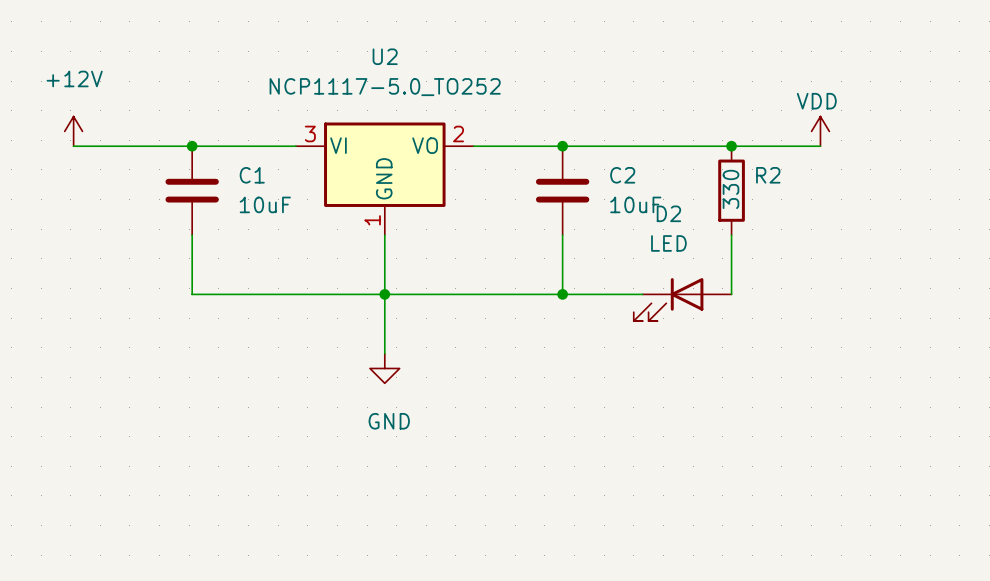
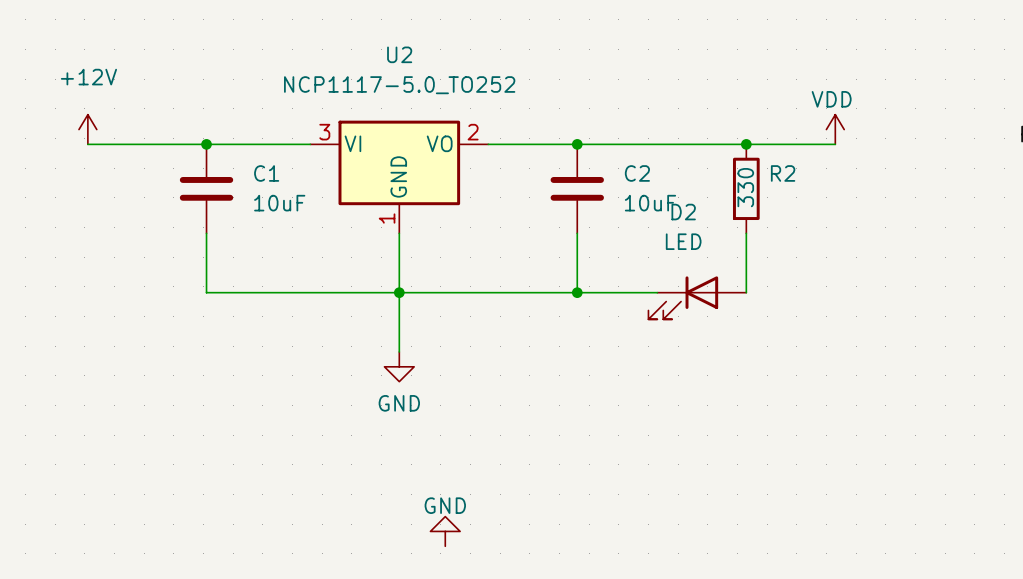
power symbol text position: GND (389, 421) -> GND (399, 403)
power symbol: none -> GND (445, 531)

